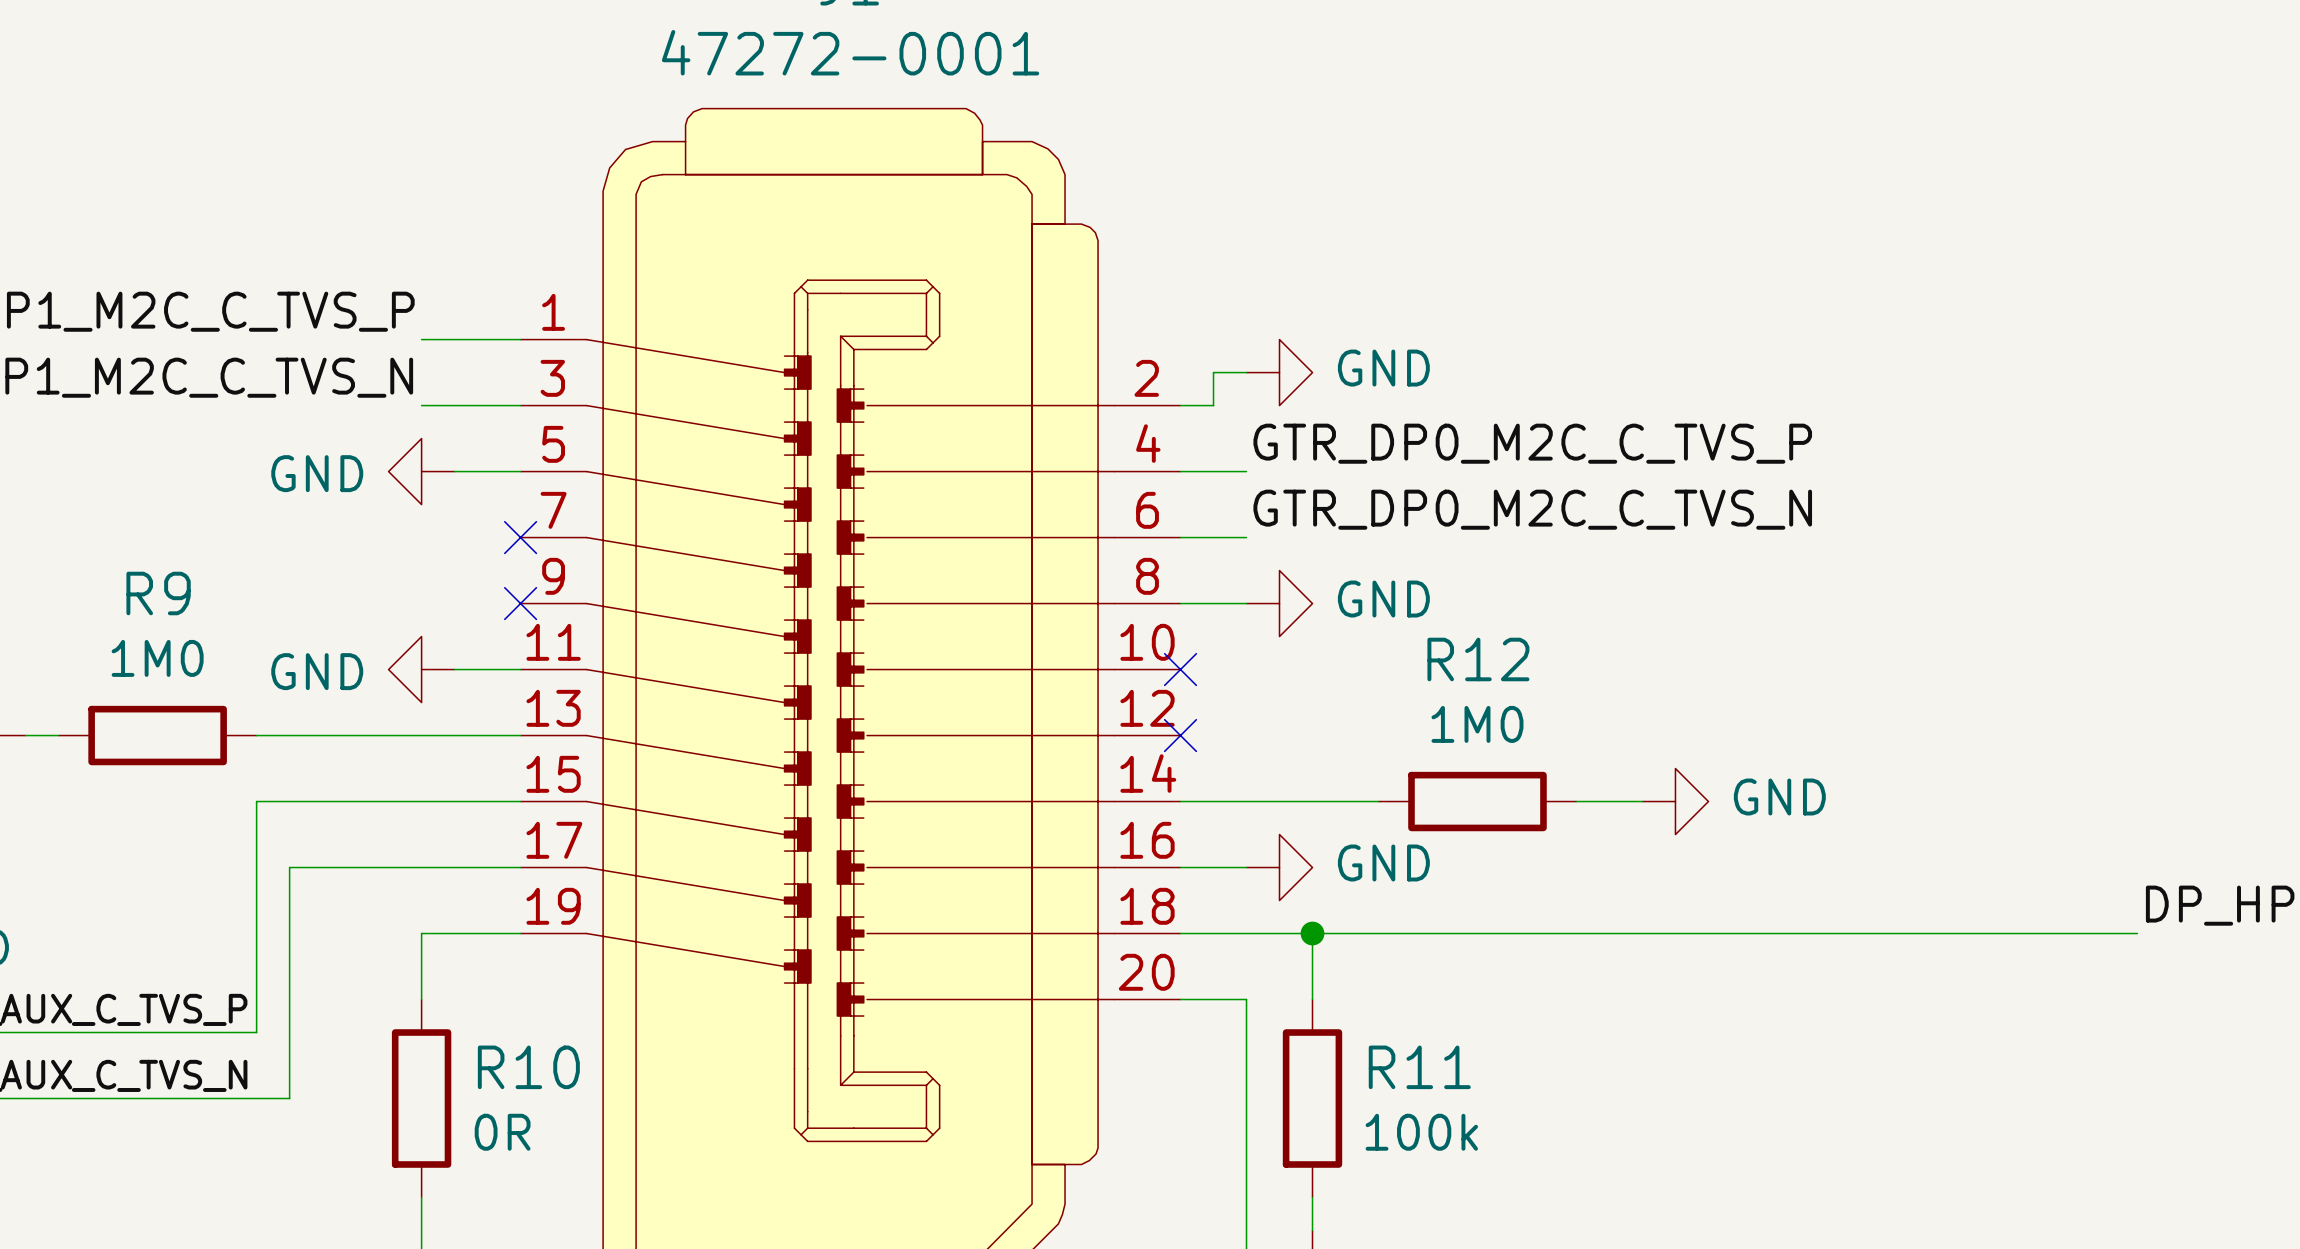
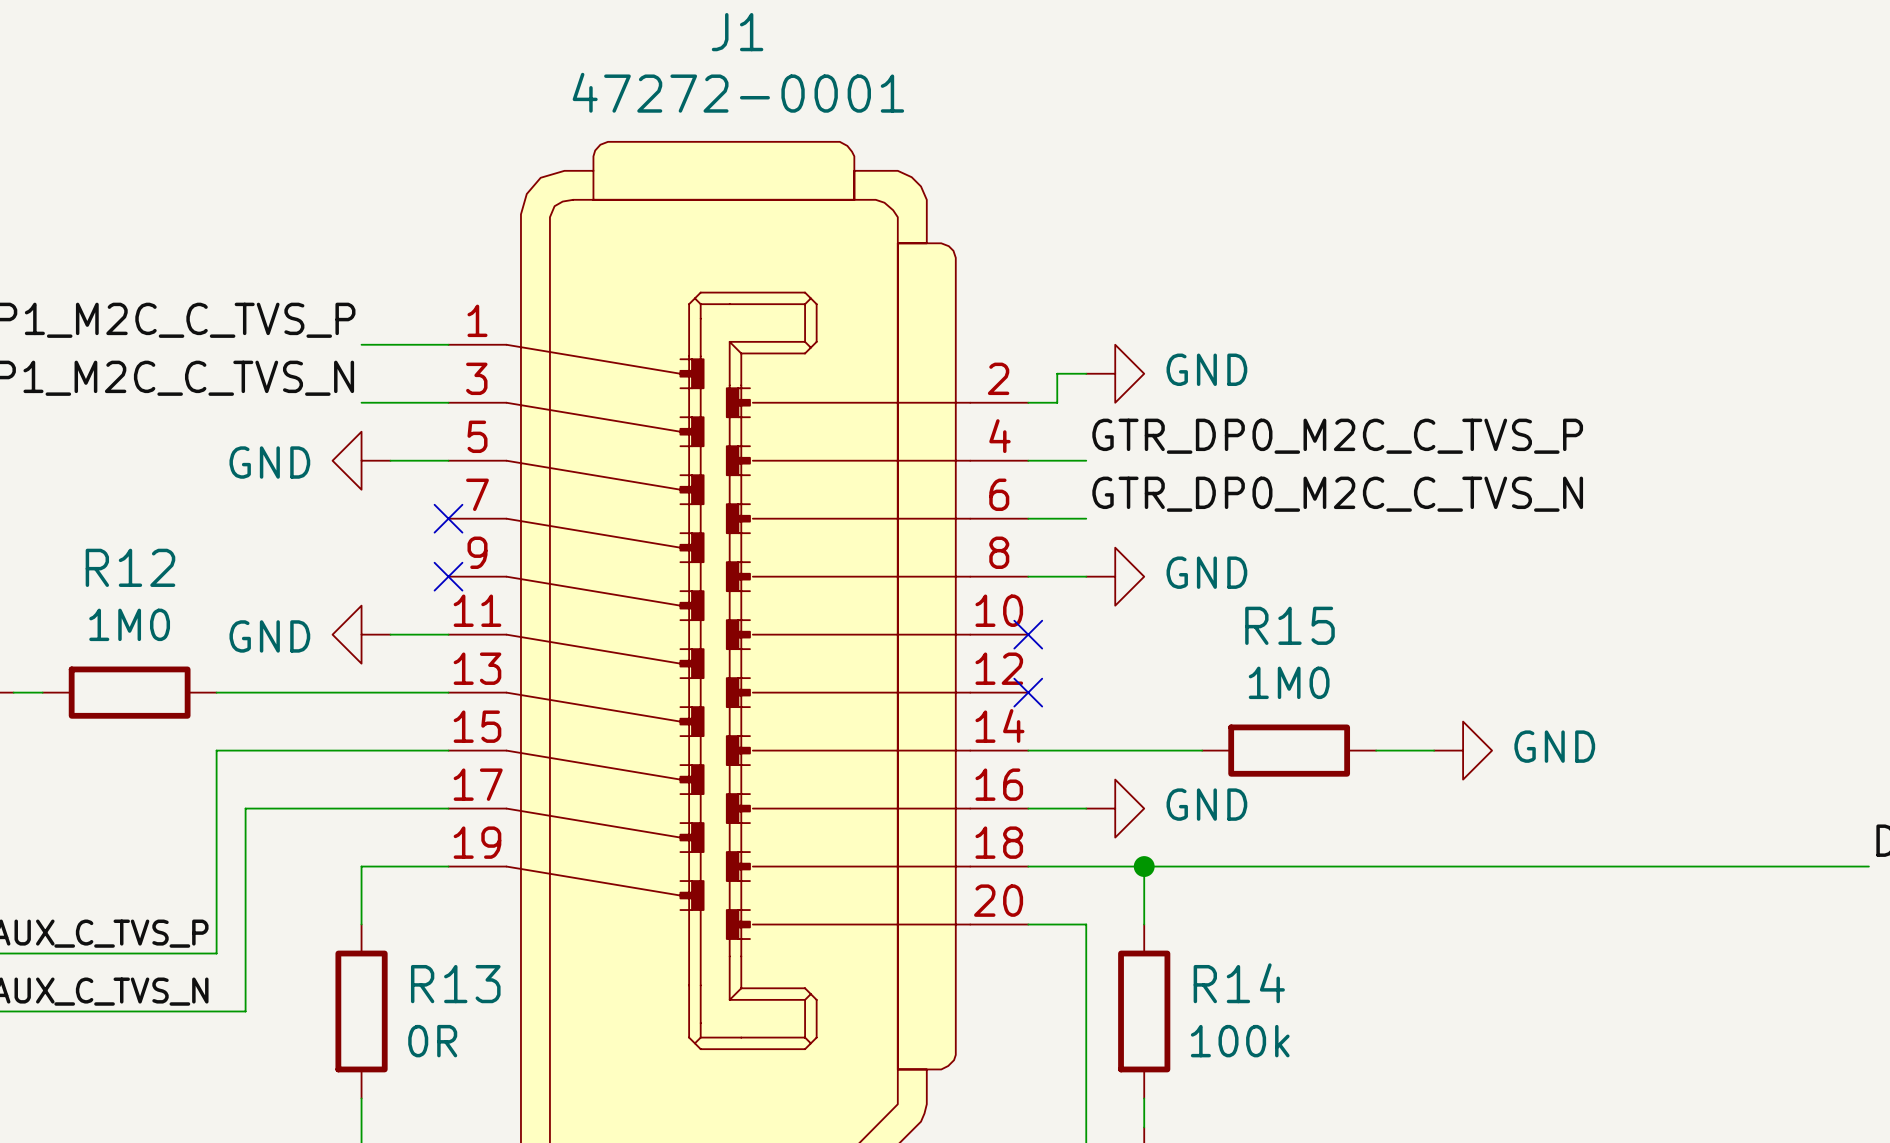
R9 name: R9 (158, 593) -> R12 (130, 567)
R12 name: R12 (1478, 659) -> R15 (1289, 625)
R10 name: R10 (528, 1067) -> R13 (455, 984)
R11 name: R11 (1419, 1067) -> R14 (1239, 983)

